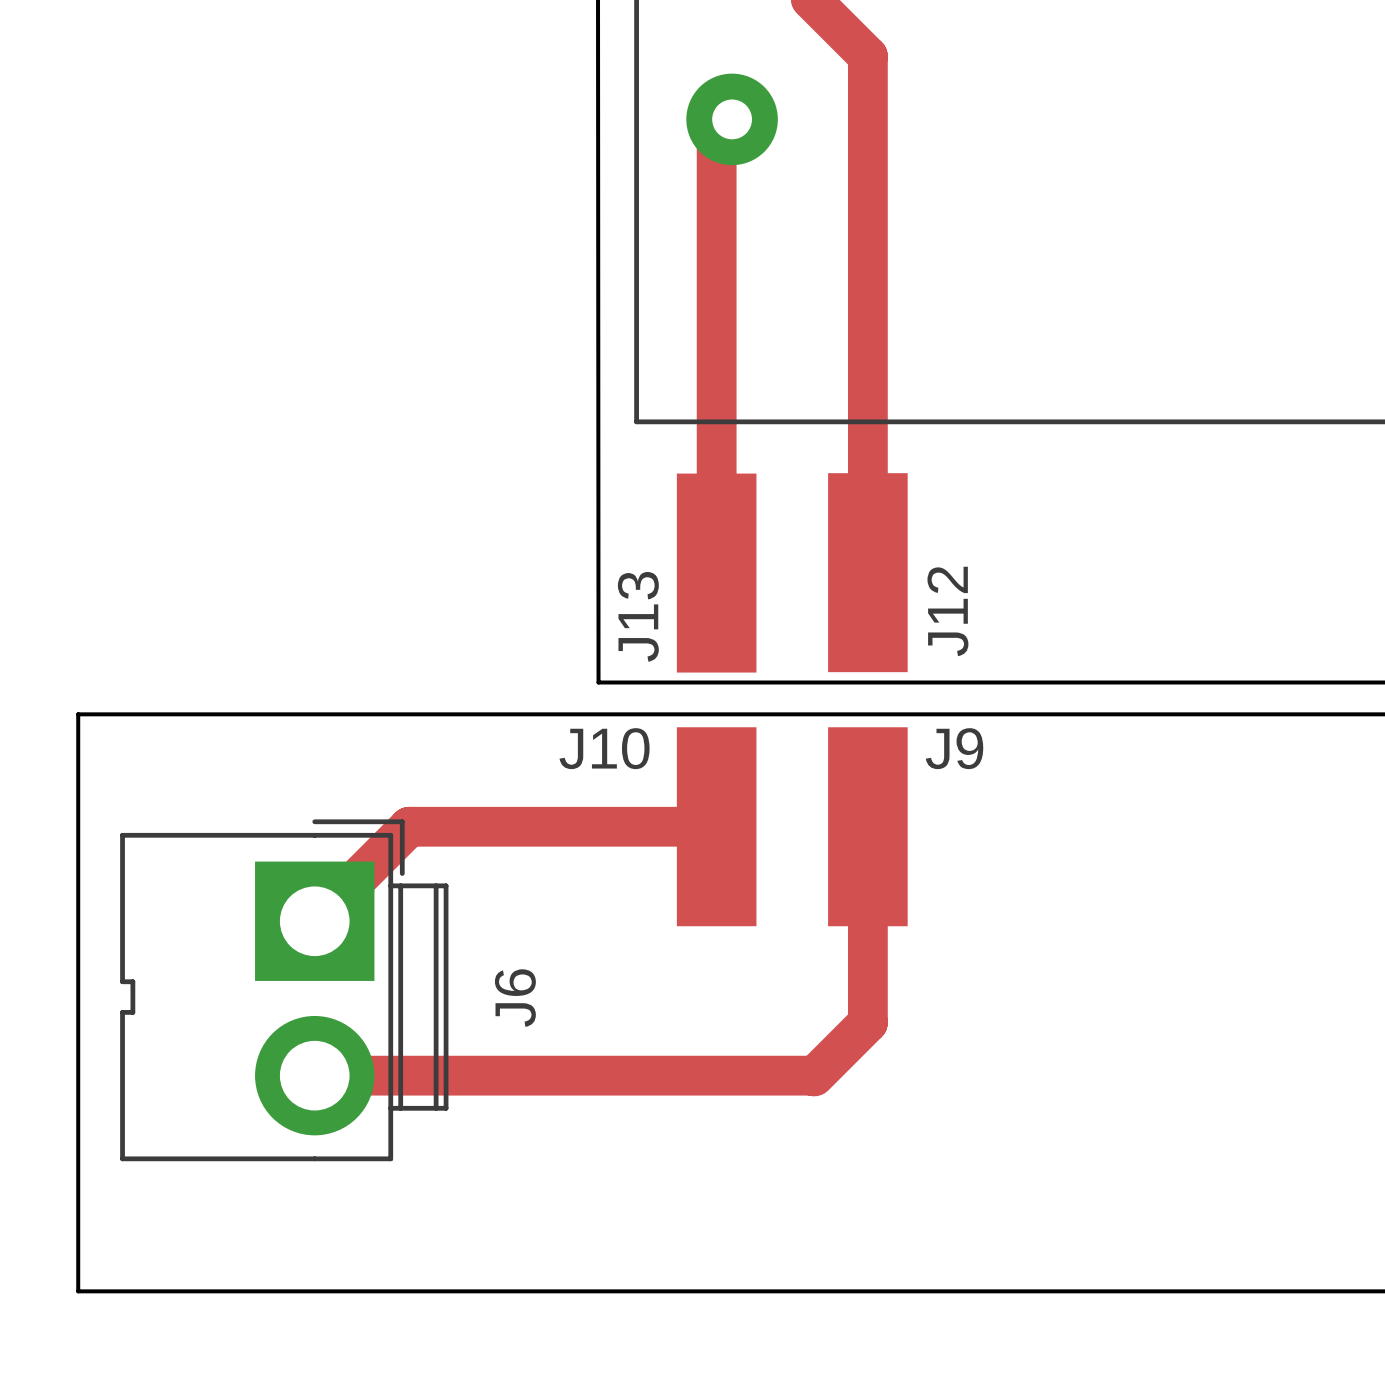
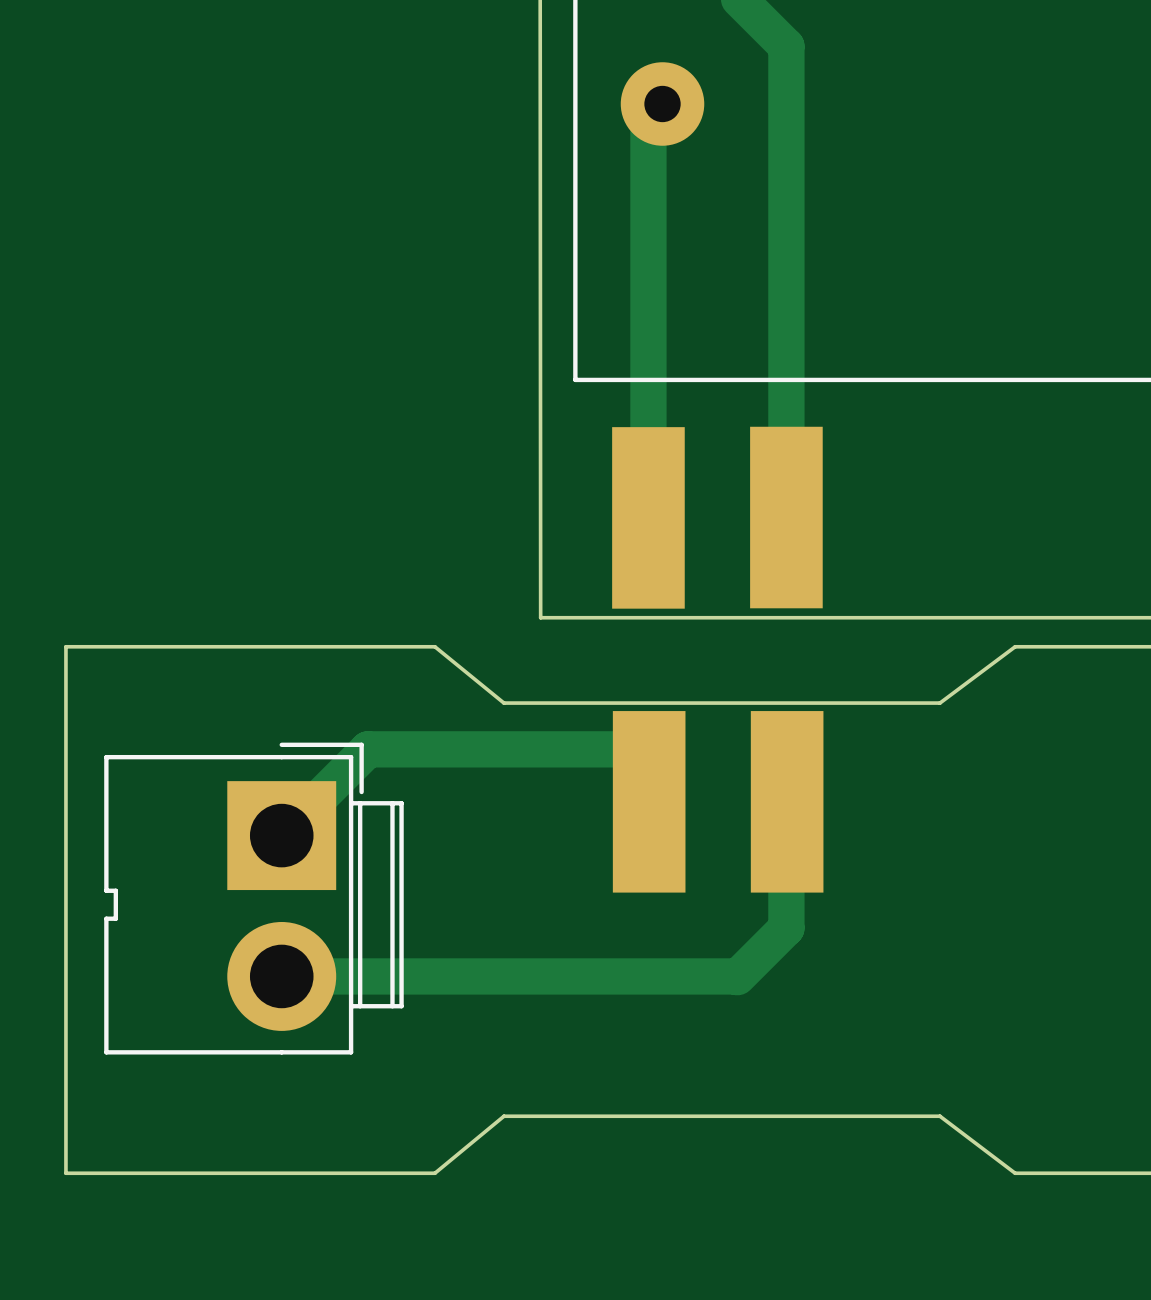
J12 name: J12 (947, 611) -> none
J13 name: J13 (638, 616) -> none
board edge: (482, 714) (1118, 714) -> (434, 646) (503, 703) (939, 703) (1015, 646)
J10: (716, 826) -> none
J9: (867, 826) -> none
part: none -> (649, 801)
part: none -> (787, 801)
J6 name: J6 (515, 998) -> none
board edge: (482, 1291) (1118, 1291) -> (434, 1173) (503, 1116) (939, 1116) (1015, 1173)

